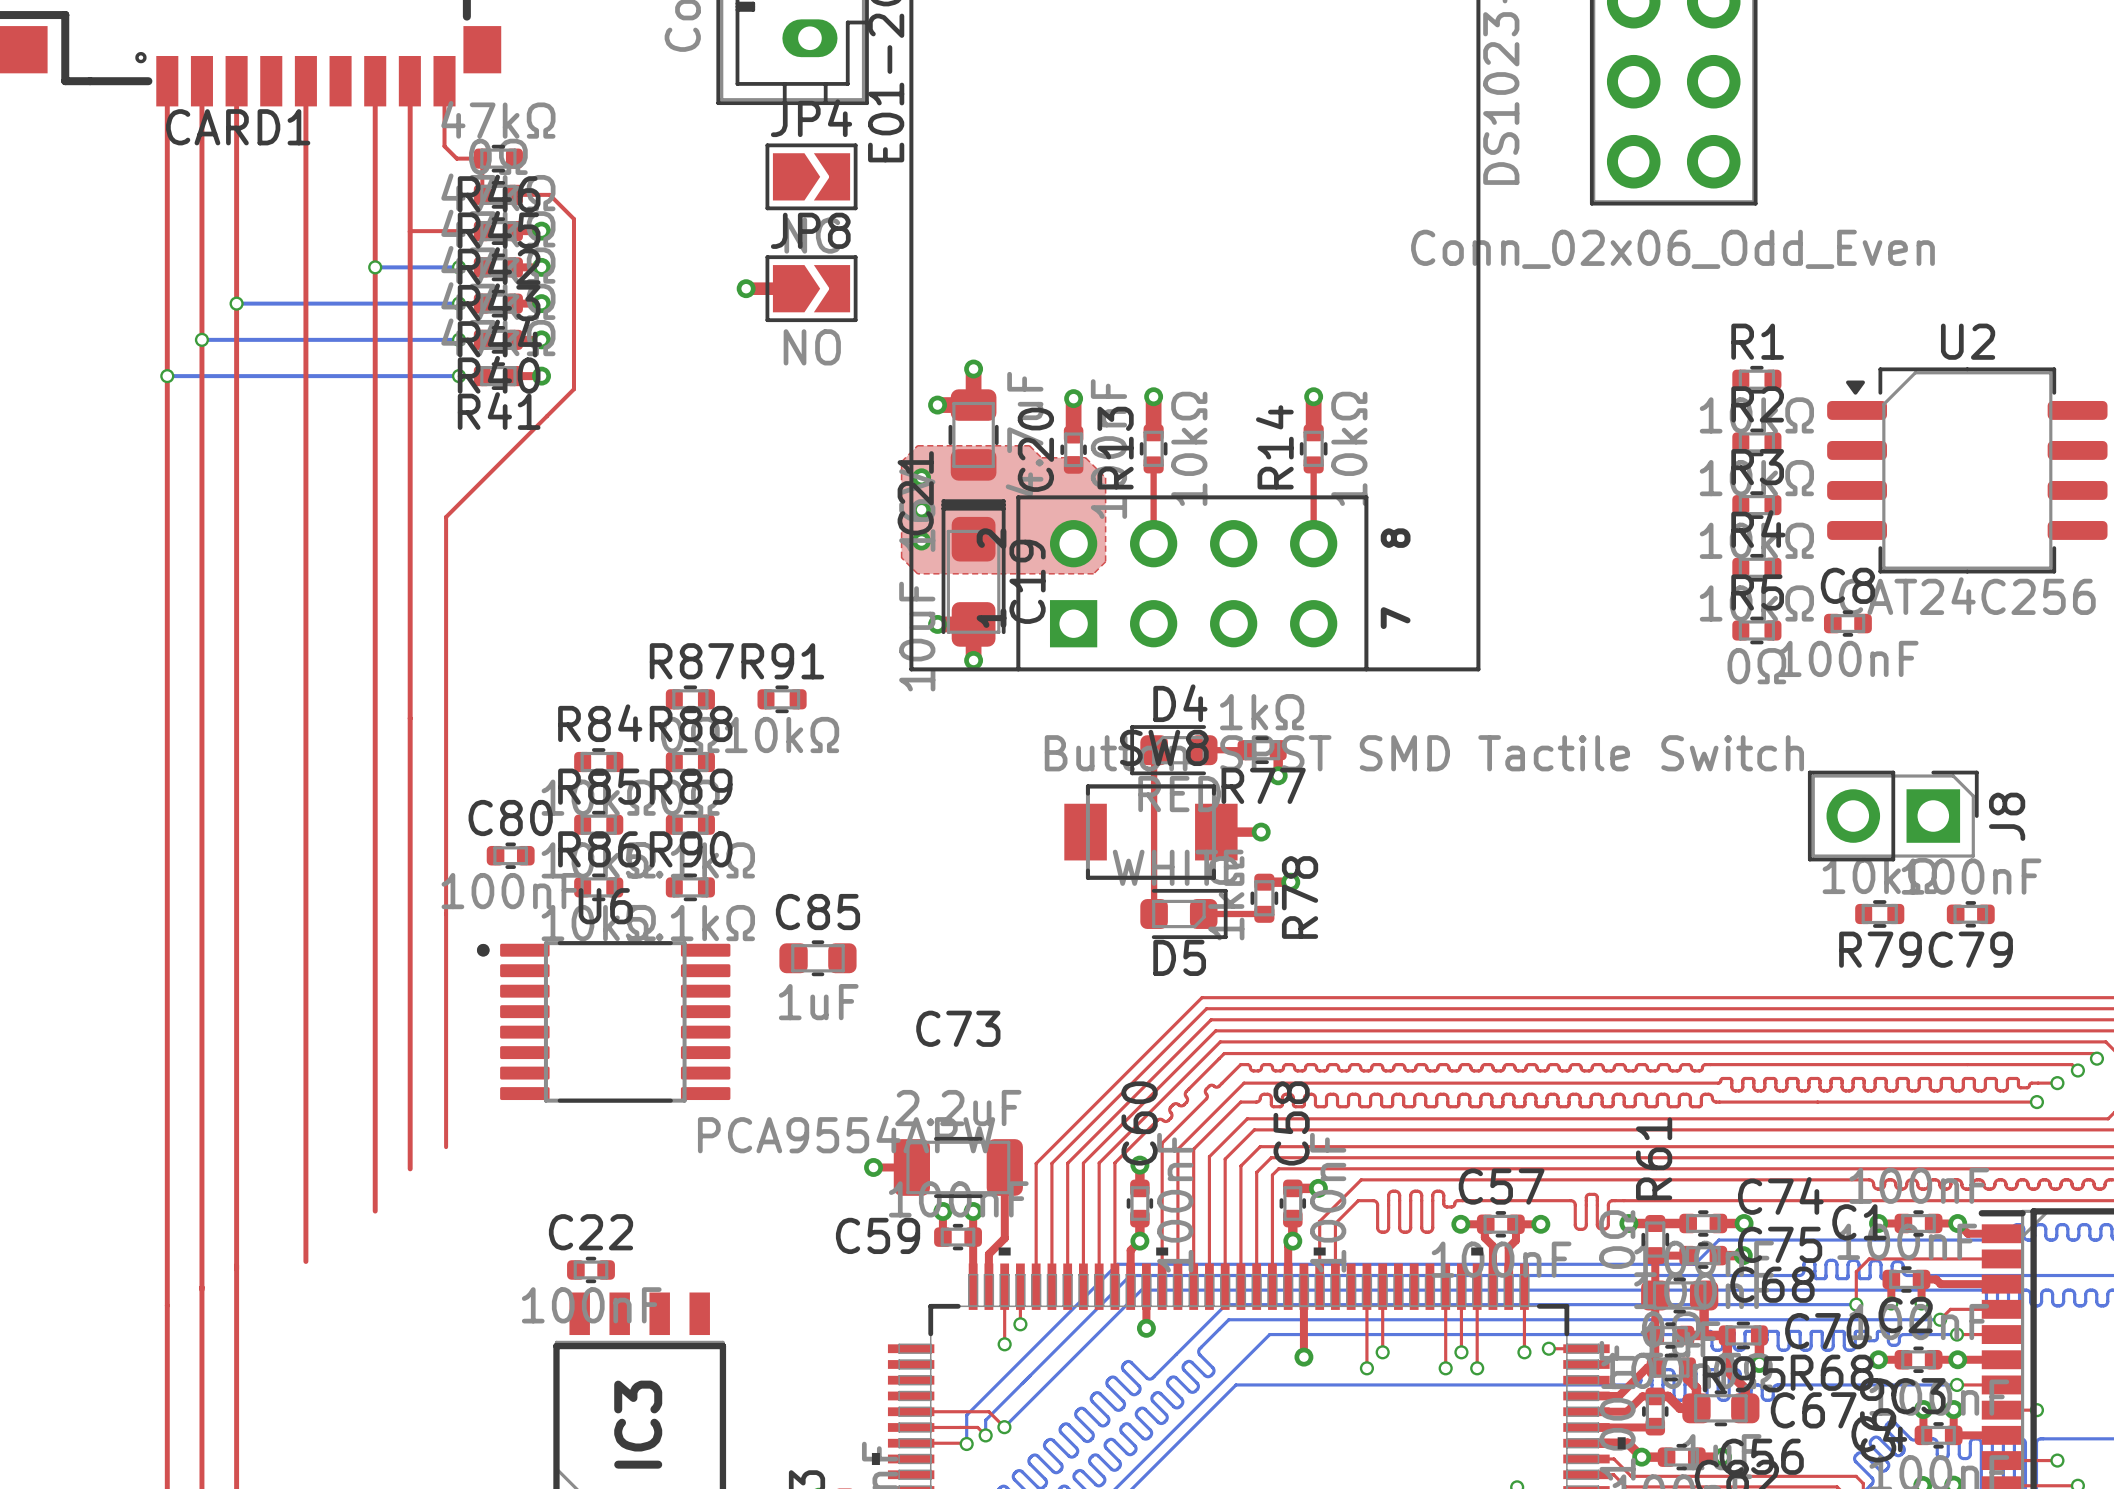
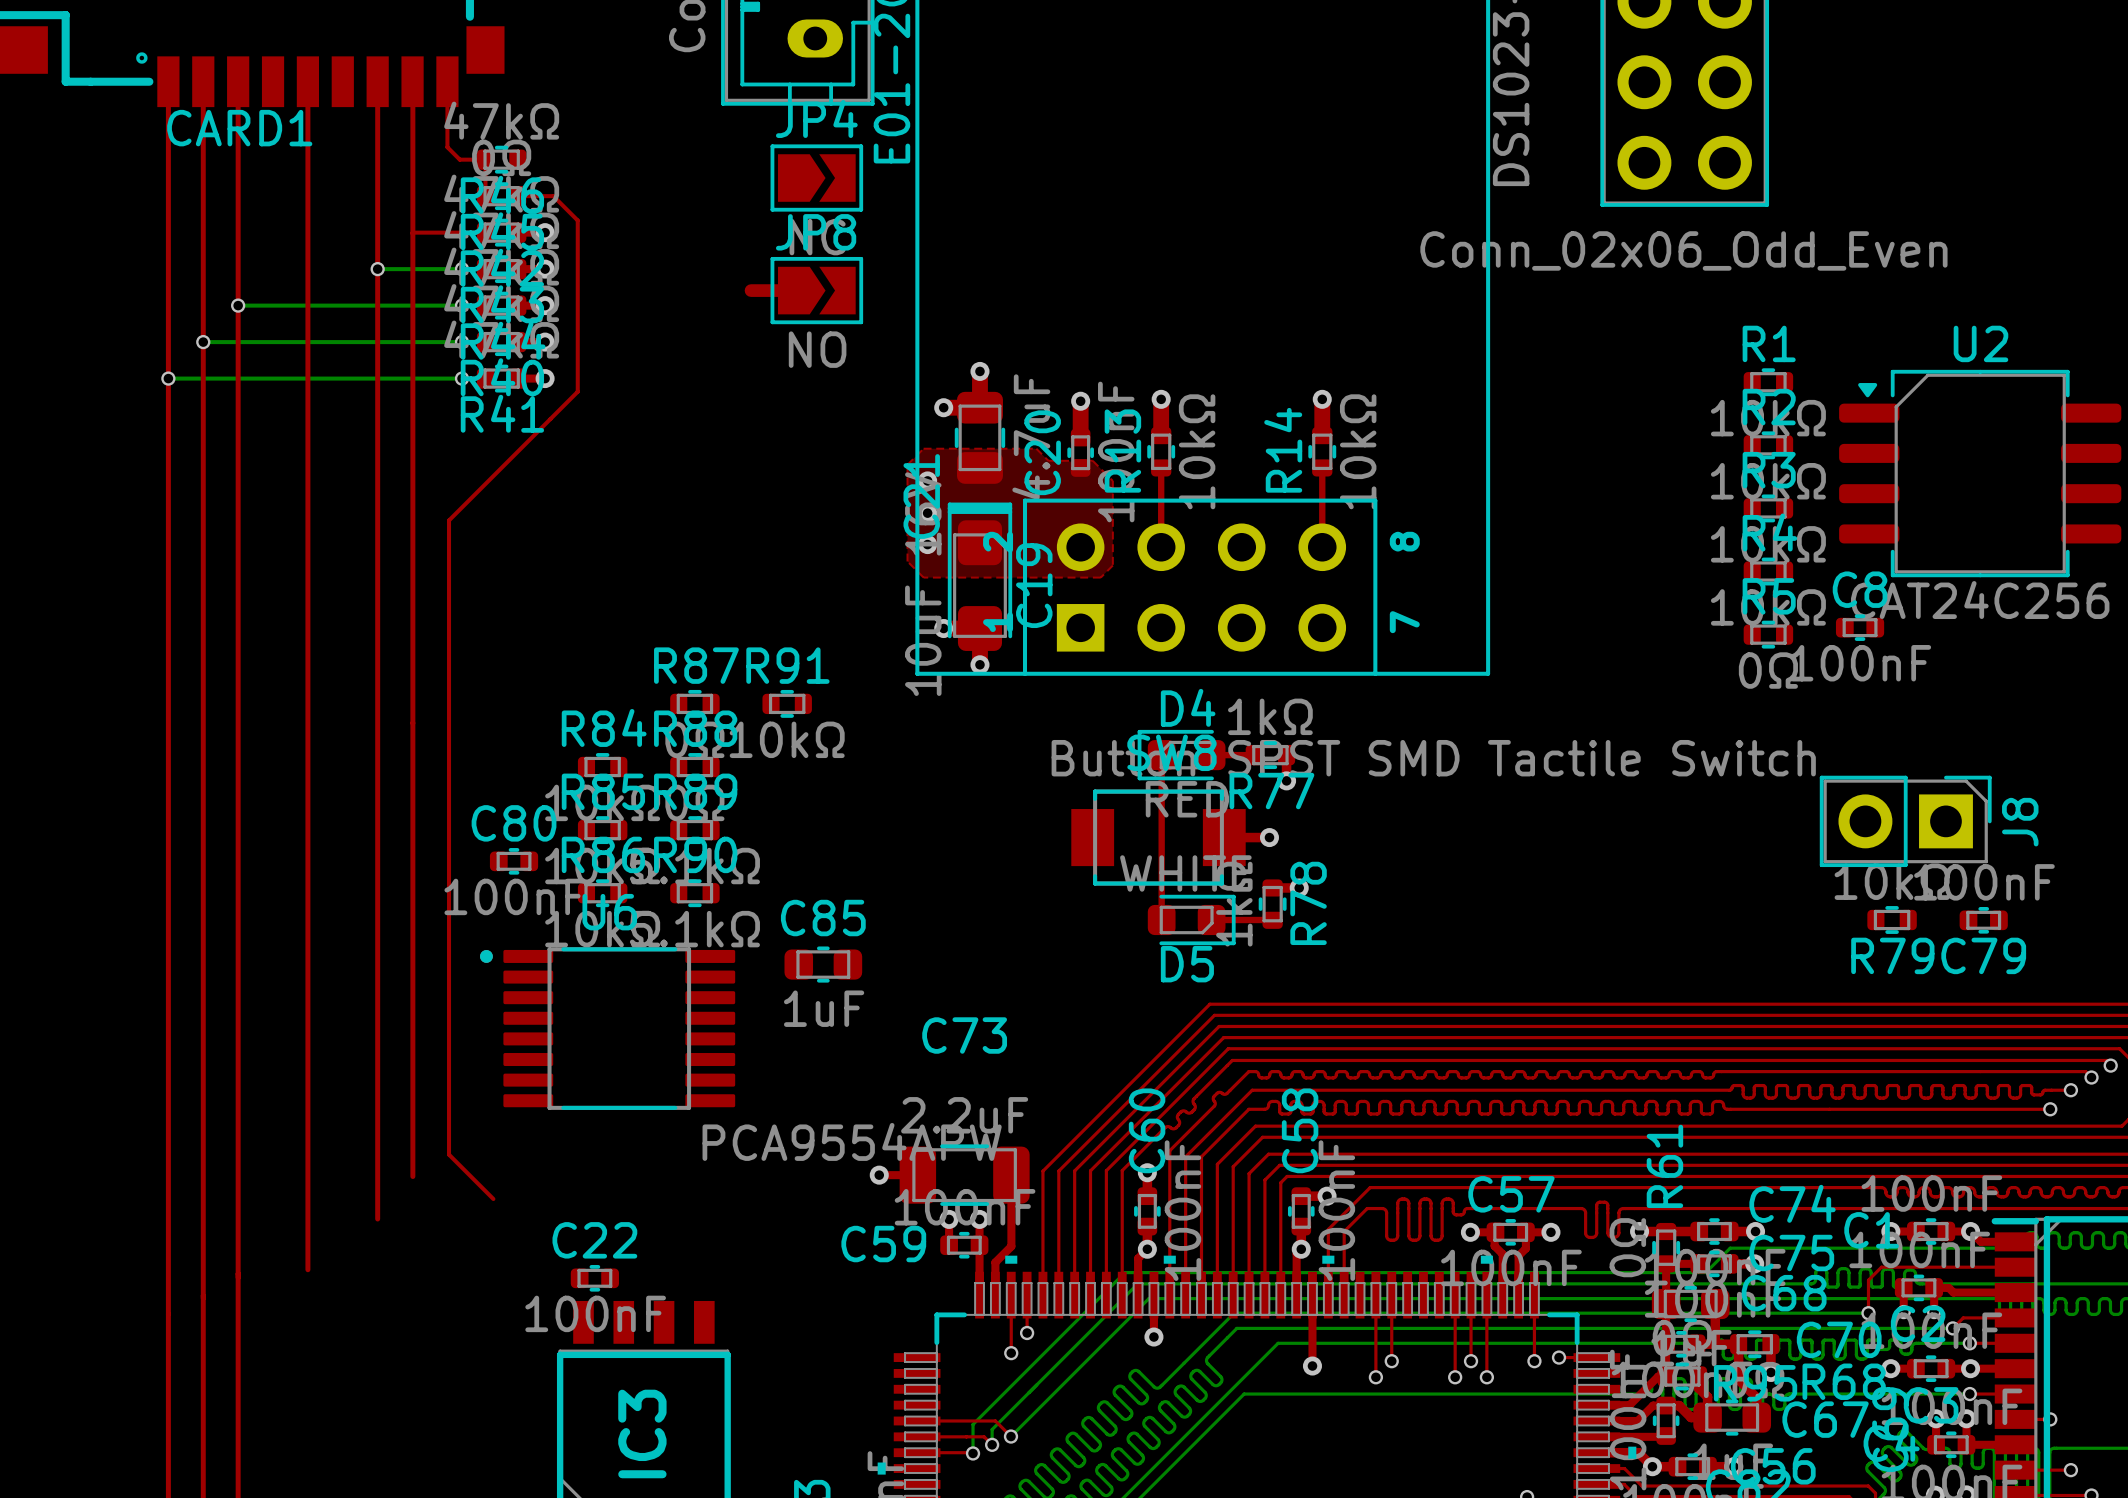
via: (746, 288) -> none
top track: none -> (449, 1154) (493, 1199)

